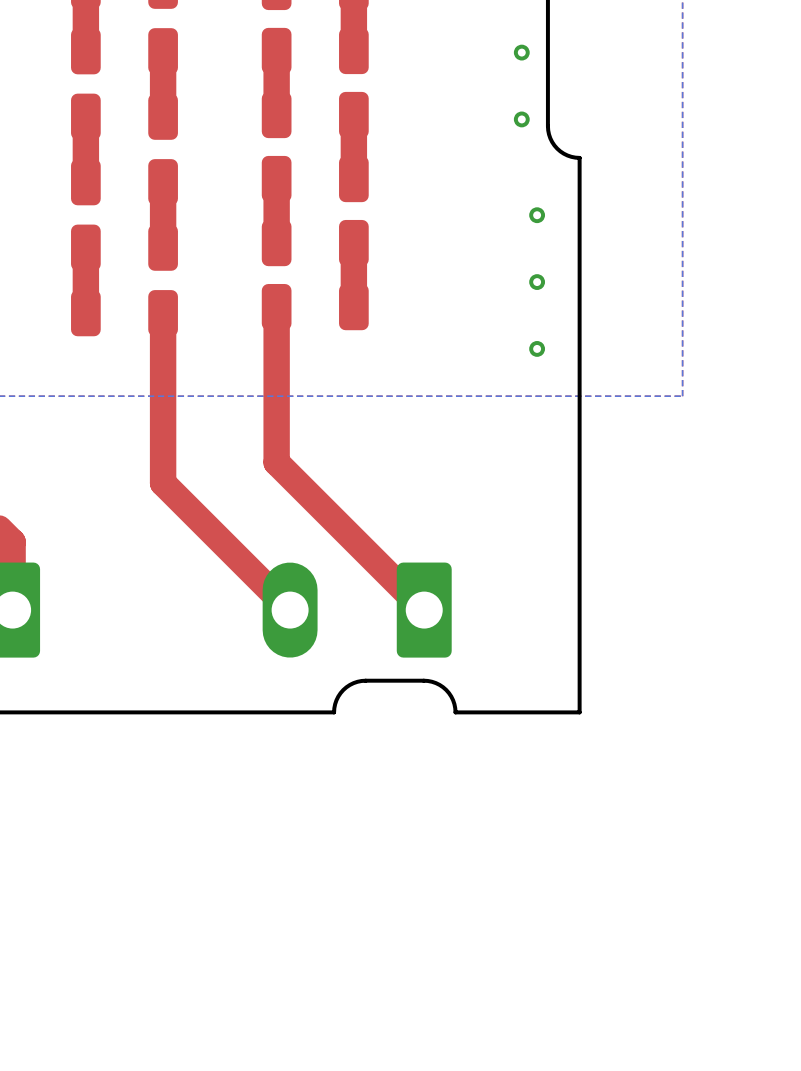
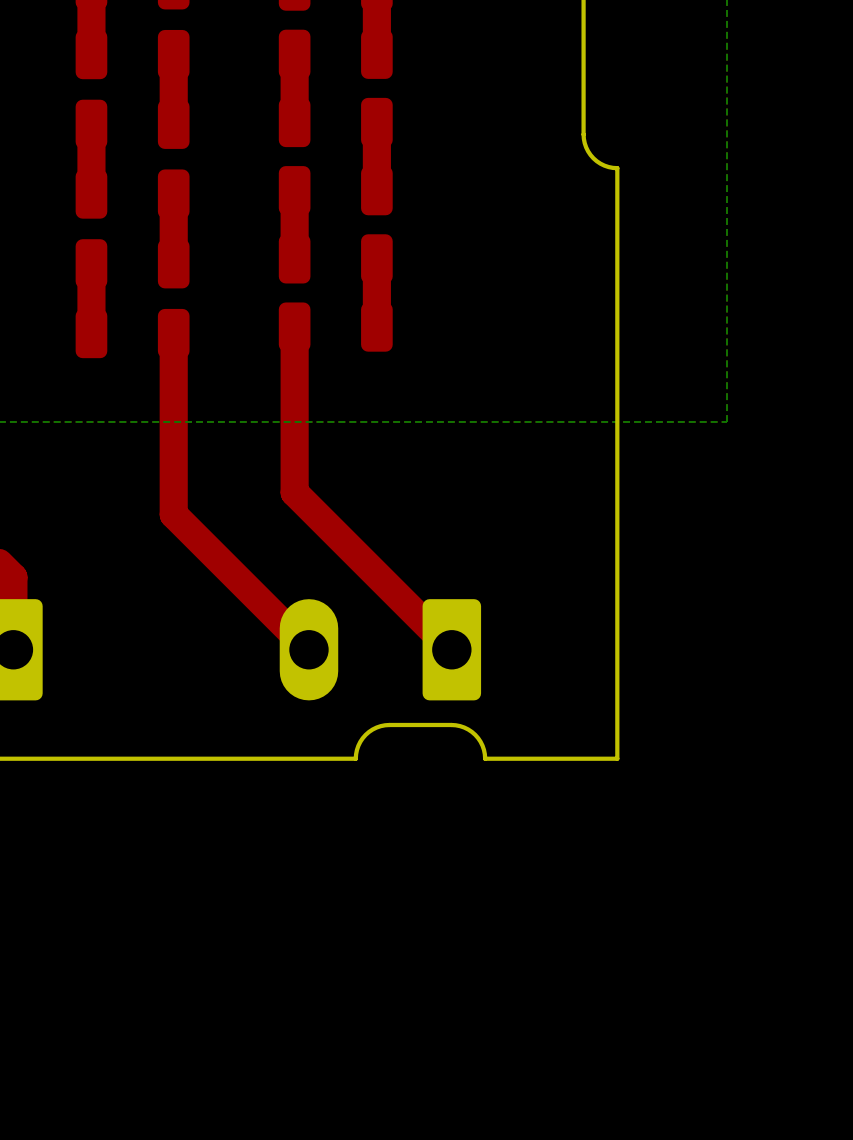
via: (521, 52) -> none
via: (521, 119) -> none
via: (537, 215) -> none
via: (537, 282) -> none
via: (537, 348) -> none

